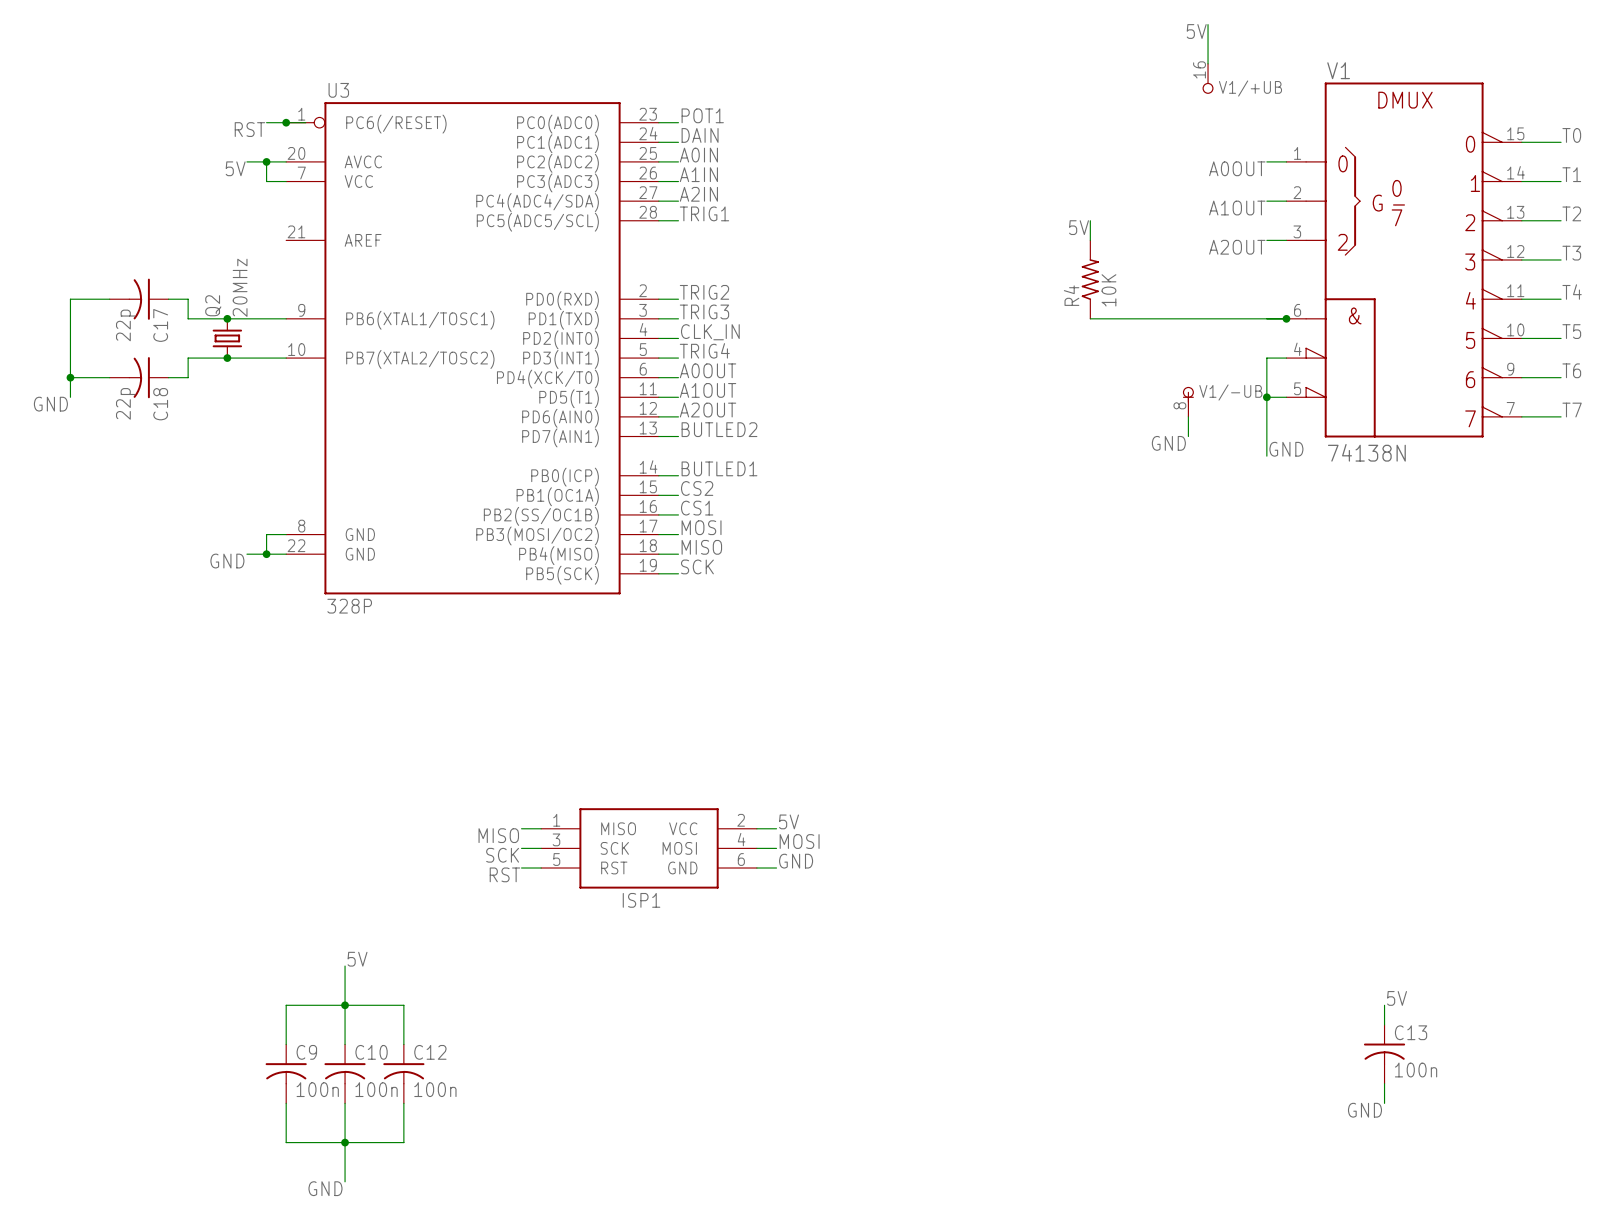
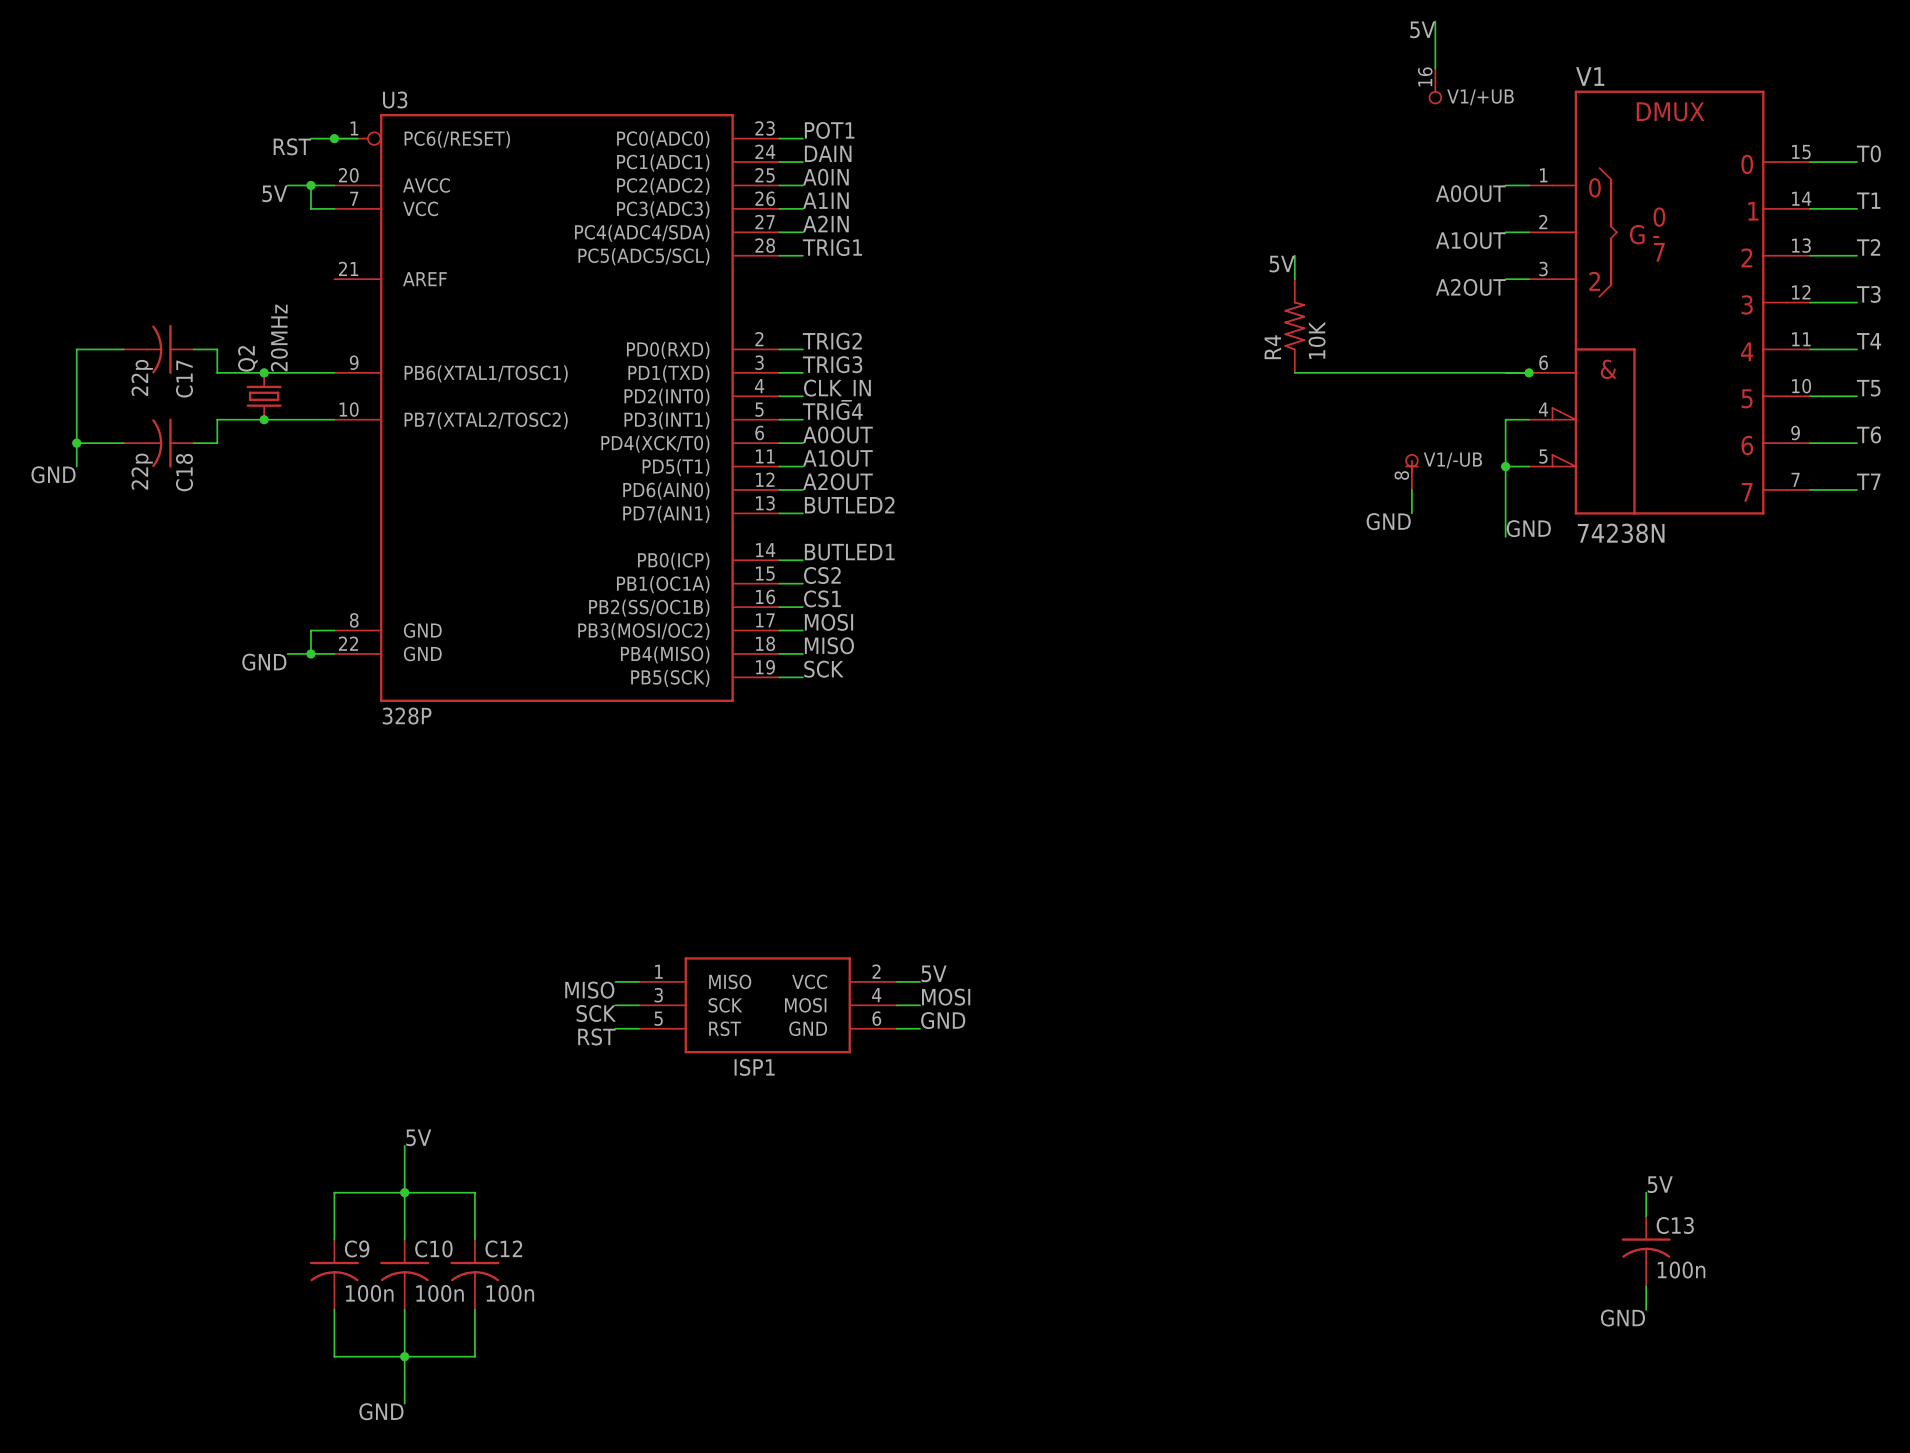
V1 symbol: [1286, 82, 1522, 438] -> [1529, 90, 1811, 515]
V1 value: 74138N (1366, 452) -> 74238N (1621, 533)

